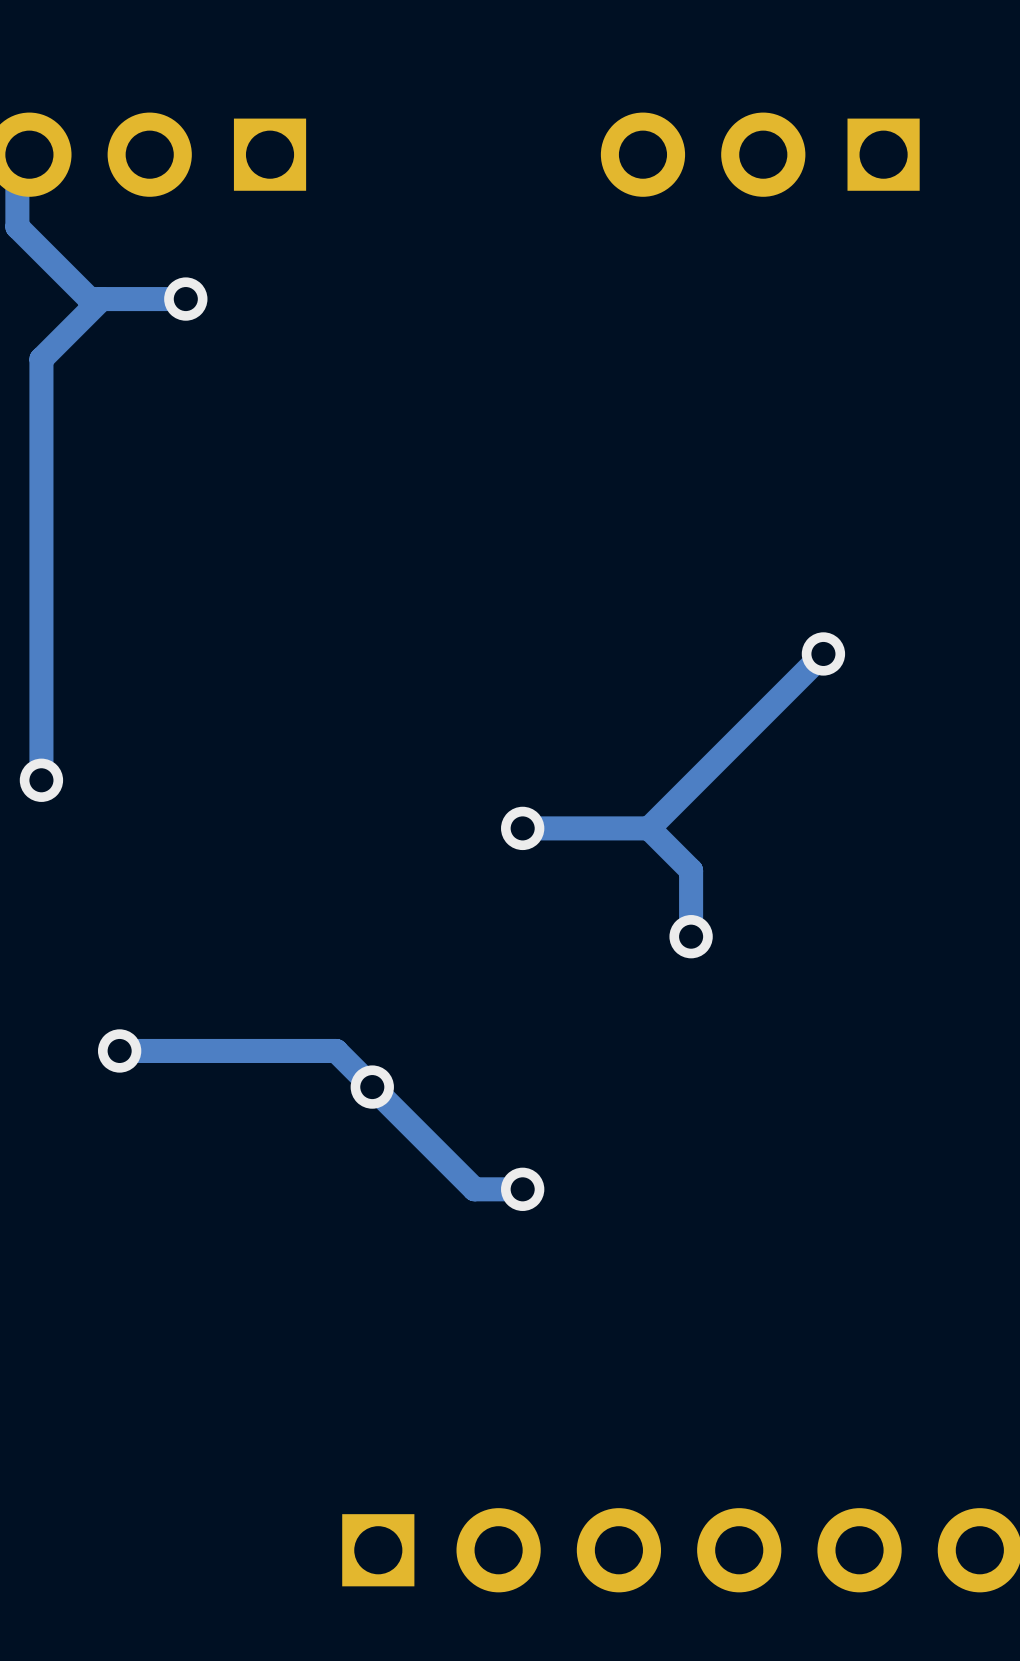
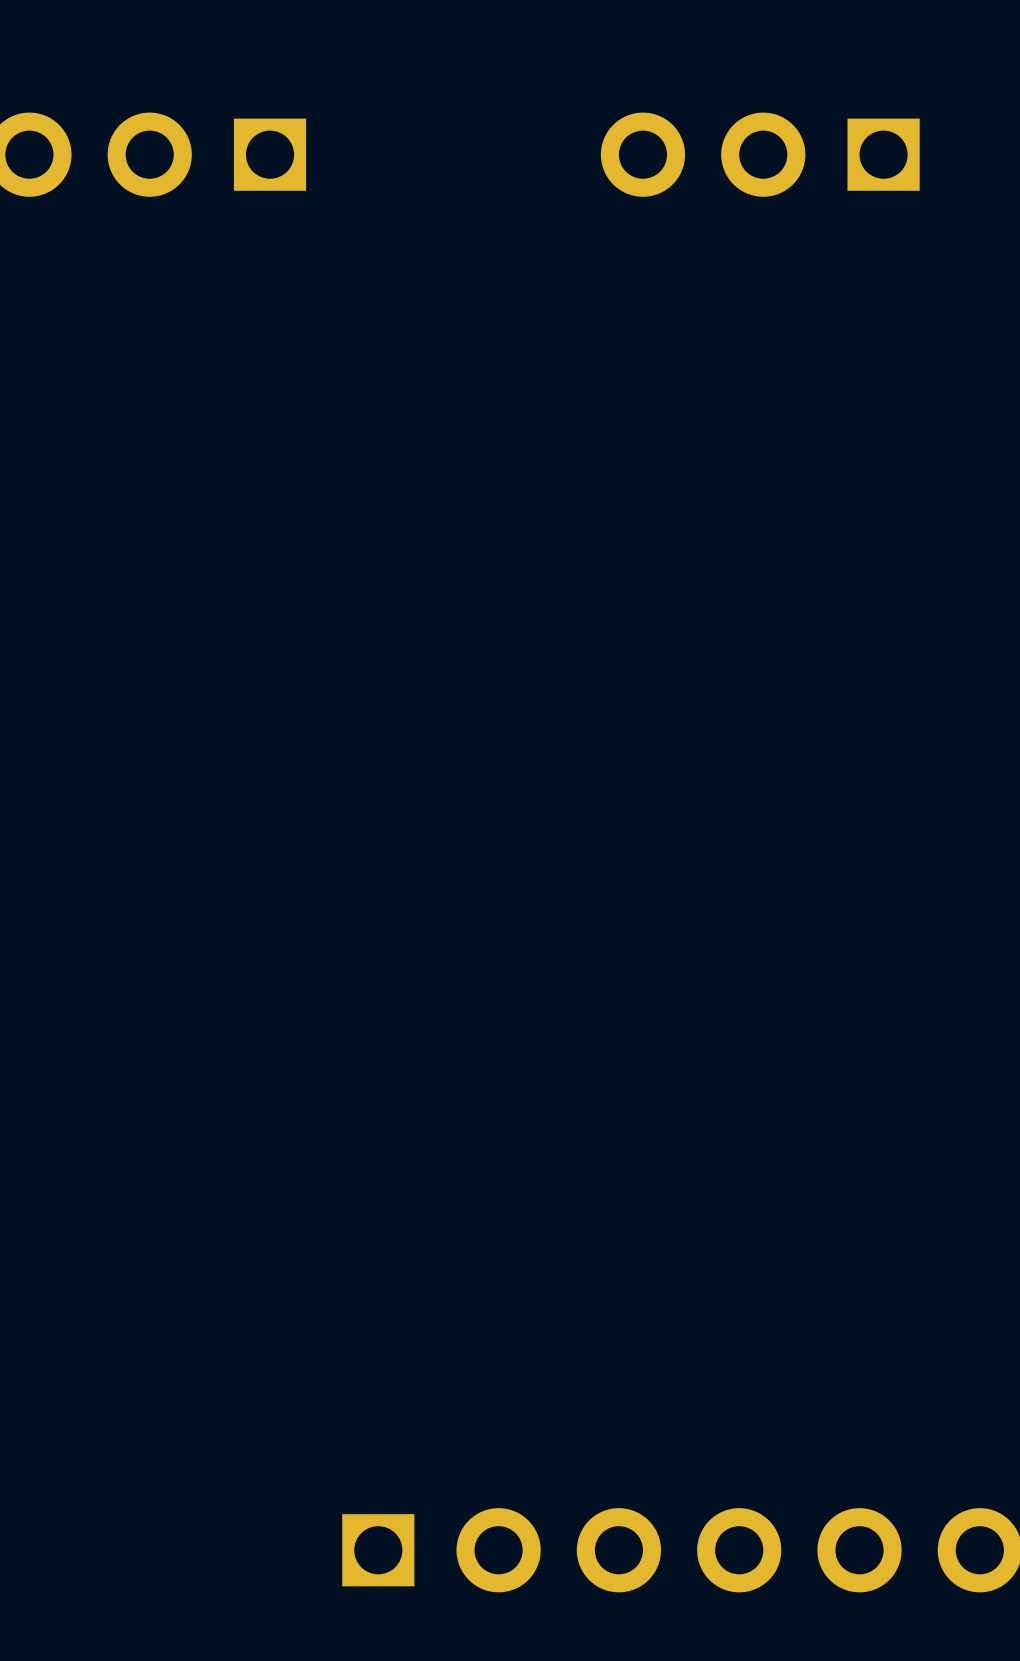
track: (29, 154) (17, 166) (17, 226) (89, 299) (185, 299) -> none
track: (101, 299) (41, 359) (41, 780) -> none
via: (185, 299) -> none
track: (823, 653) (648, 828) -> none
via: (823, 653) -> none
via: (41, 780) -> none
via: (522, 828) -> none
track: (648, 828) (522, 828) -> none
track: (648, 828) (691, 870) (691, 936) -> none
via: (691, 936) -> none
track: (119, 1050) (336, 1050) (474, 1189) (522, 1189) -> none
via: (119, 1050) -> none
via: (372, 1087) -> none
via: (522, 1189) -> none

